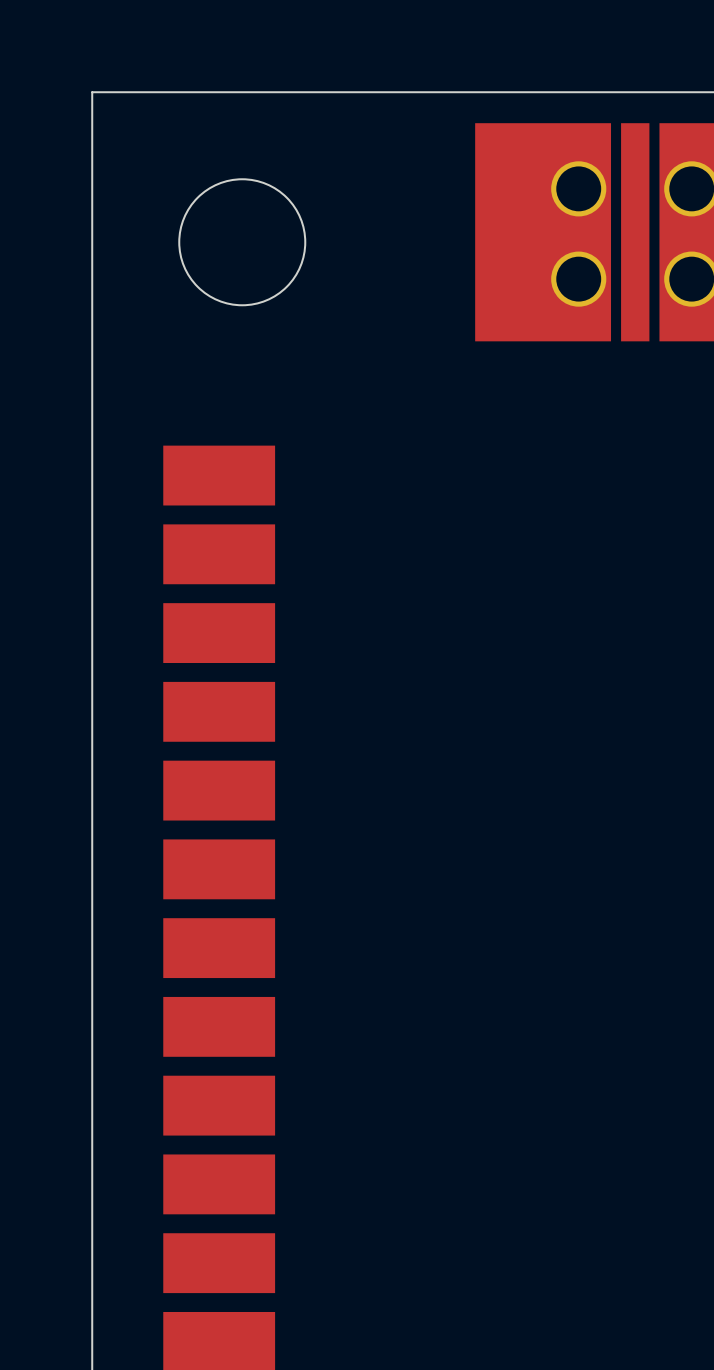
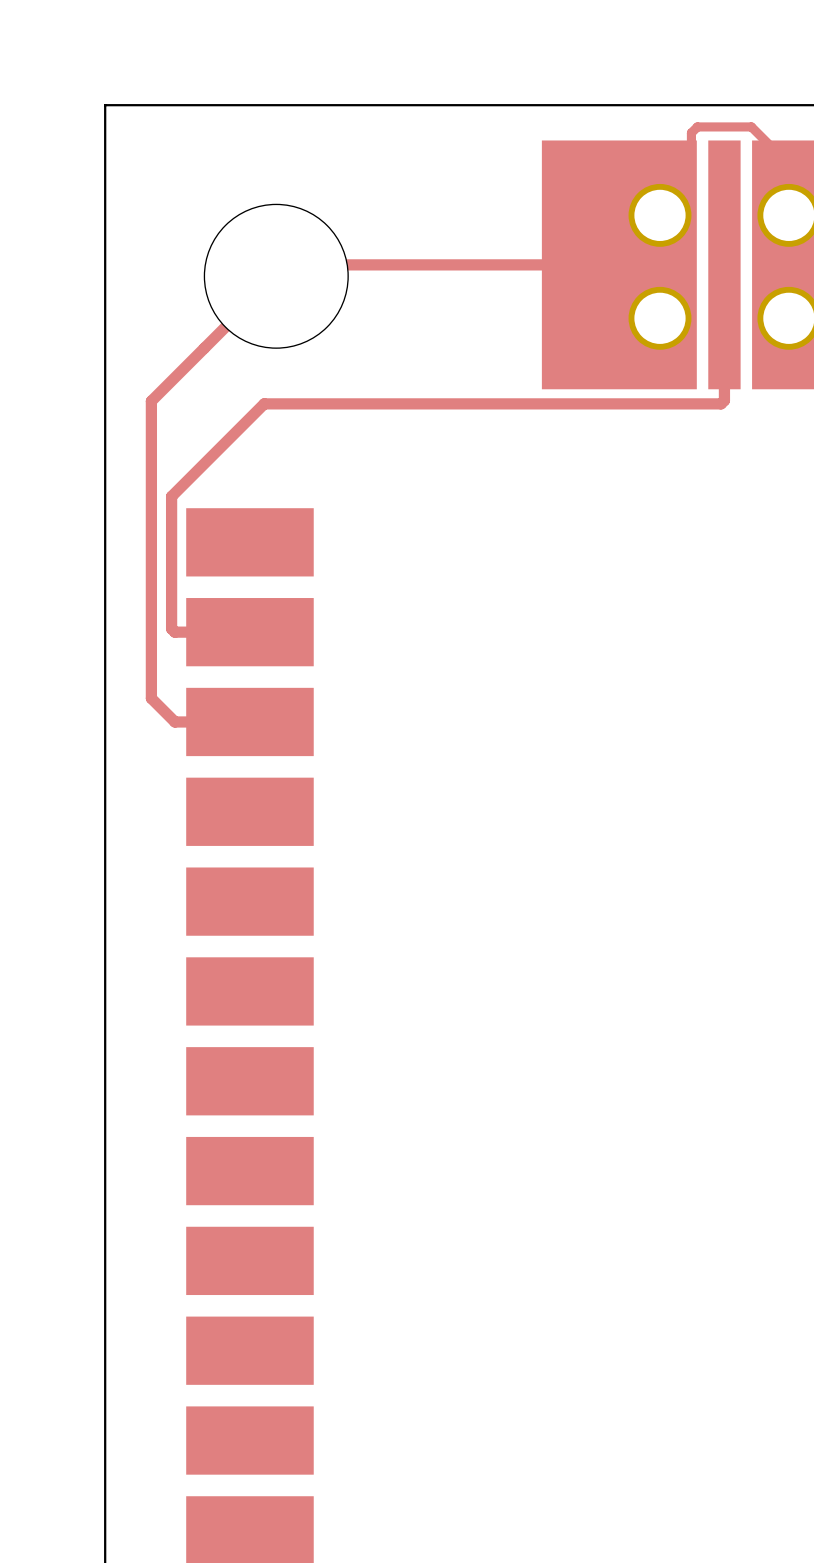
top track: none -> (788, 164) (751, 126) (697, 126) (691, 132) (691, 183)
top track: none -> (619, 264) (287, 264)
top track: none -> (724, 264) (724, 400) (721, 403) (264, 403) (171, 496) (171, 628) (174, 632) (249, 632)
top track: none -> (276, 276) (151, 401) (151, 698) (174, 721) (249, 721)

